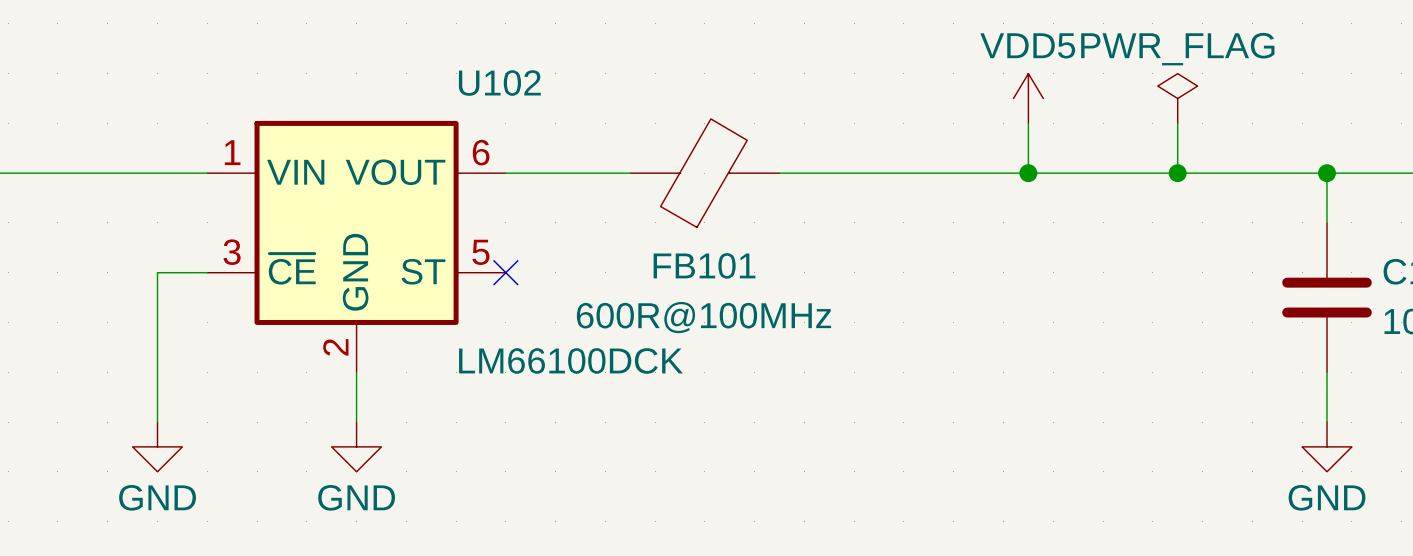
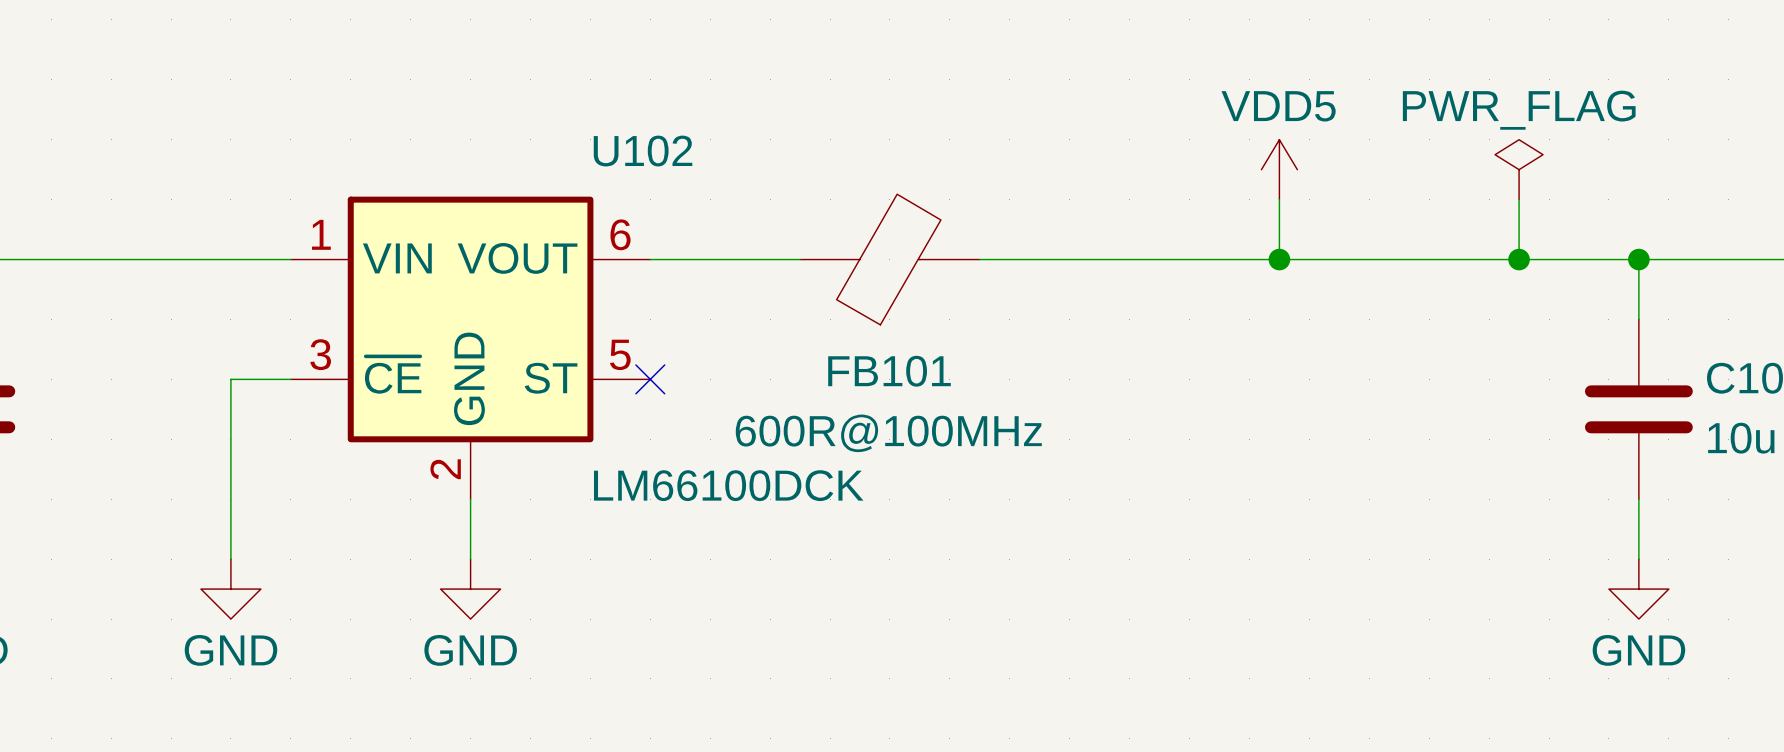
power symbol position: PWR_FLAG (1177, 98) -> PWR_FLAG (1519, 169)
wire: (1177, 123) (1177, 173) -> (1519, 199) (1519, 259)
junction position: (1177, 173) -> (1519, 259)

